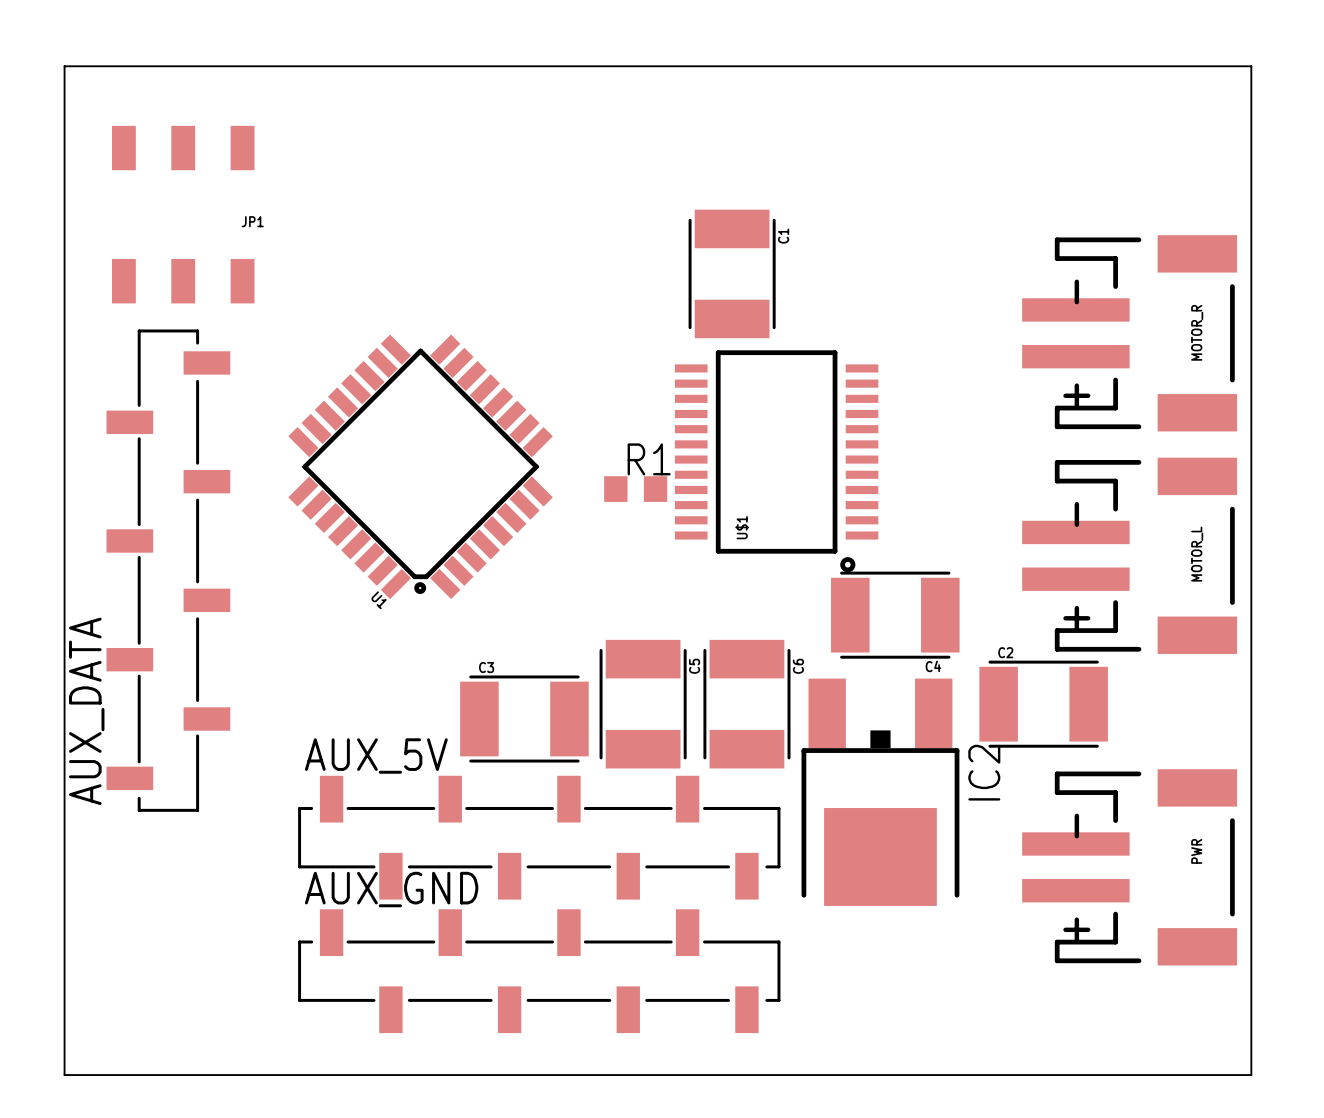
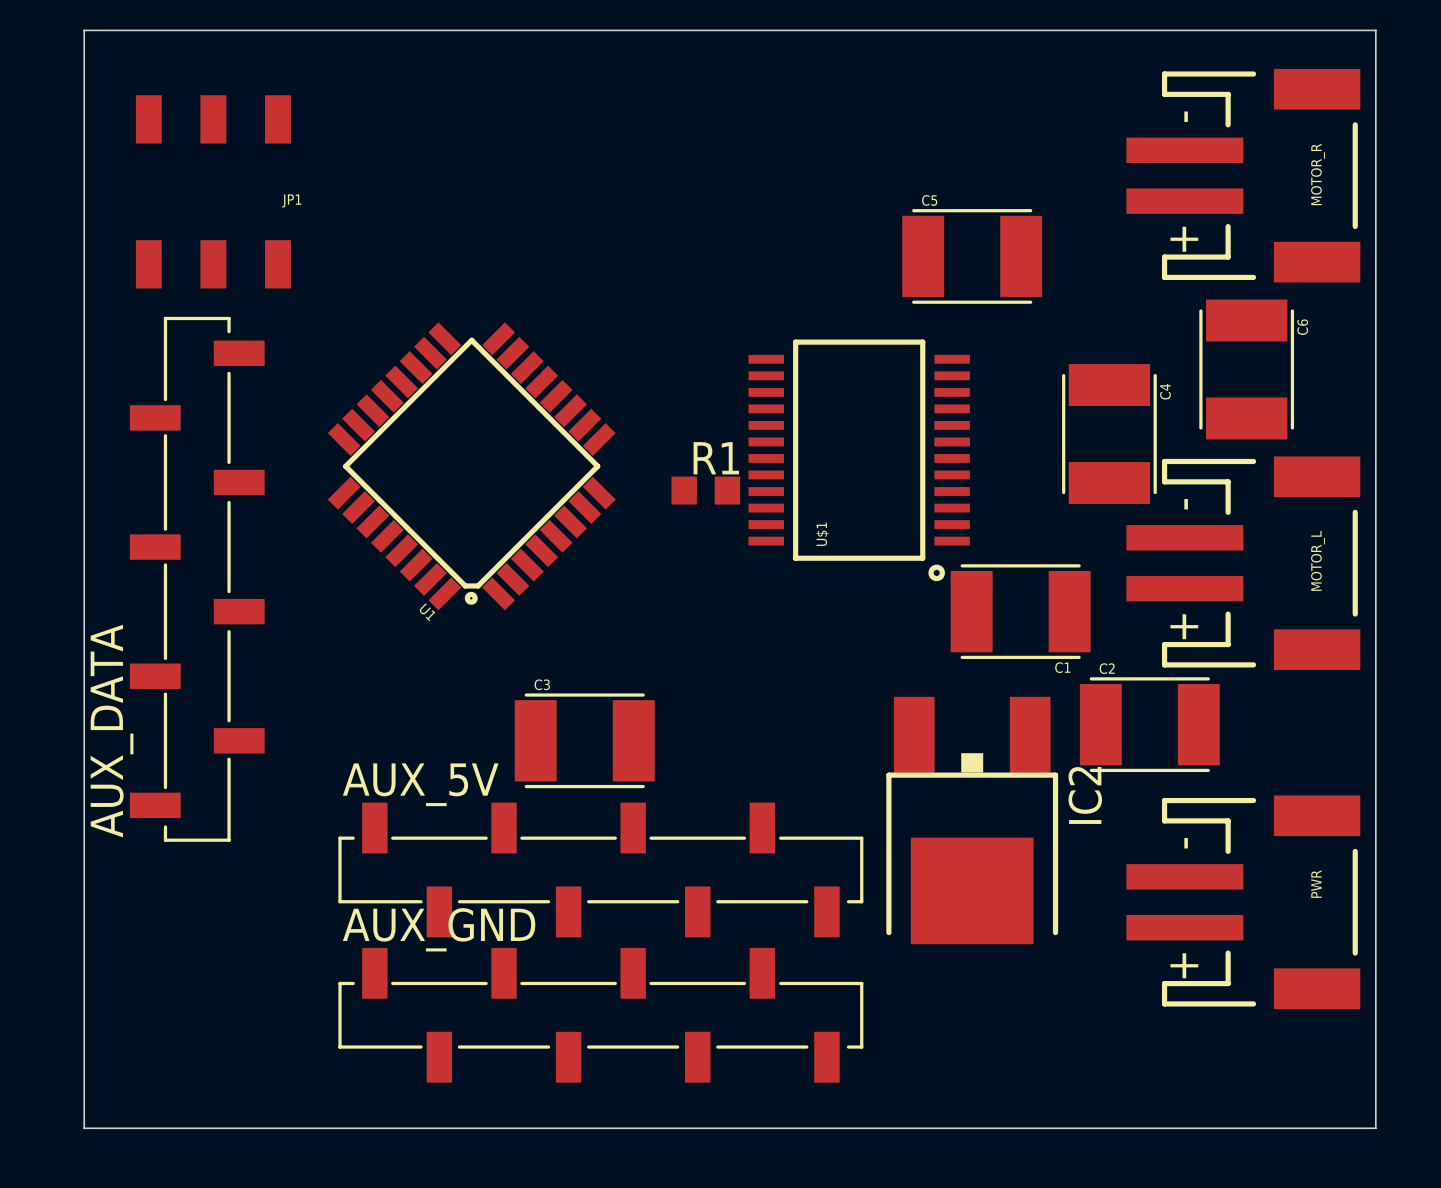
C1 rotation: 0° (732, 273) -> 90° clockwise (1020, 611)
C1 position: (732, 273) -> (1020, 611)
MOTOR_R position: (1129, 333) -> (1243, 175)
C4 rotation: 0° (895, 615) -> 90° clockwise (1109, 434)
C4 position: (895, 615) -> (1109, 434)
C5 name position: C5 (694, 666) -> C5 (929, 200)
C4 name position: C4 (933, 666) -> C4 (1165, 391)
C5 rotation: 0° (643, 704) -> 90° clockwise (972, 256)
C5 position: (643, 704) -> (972, 256)
C6 position: (746, 704) -> (1246, 369)

